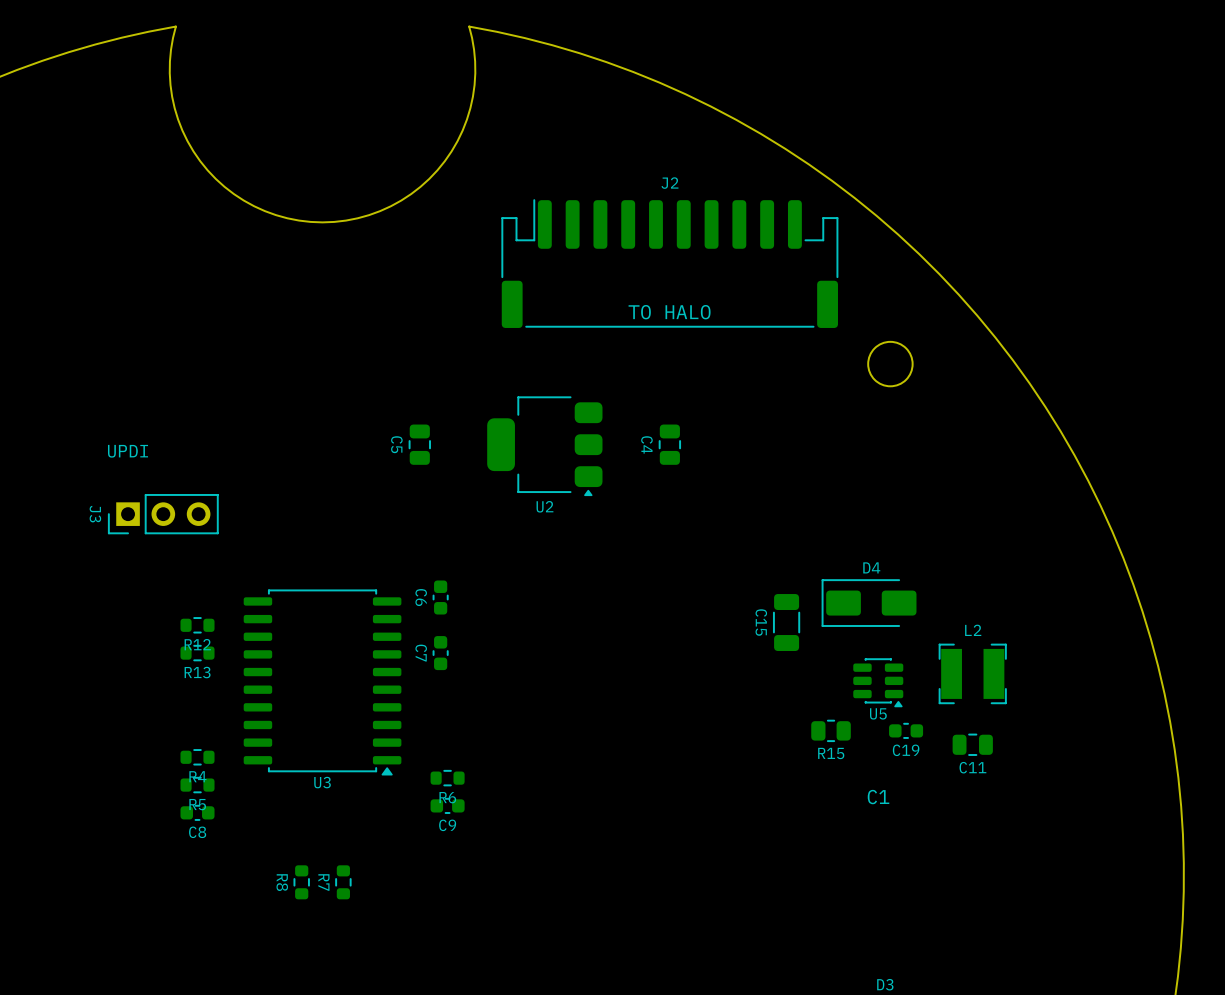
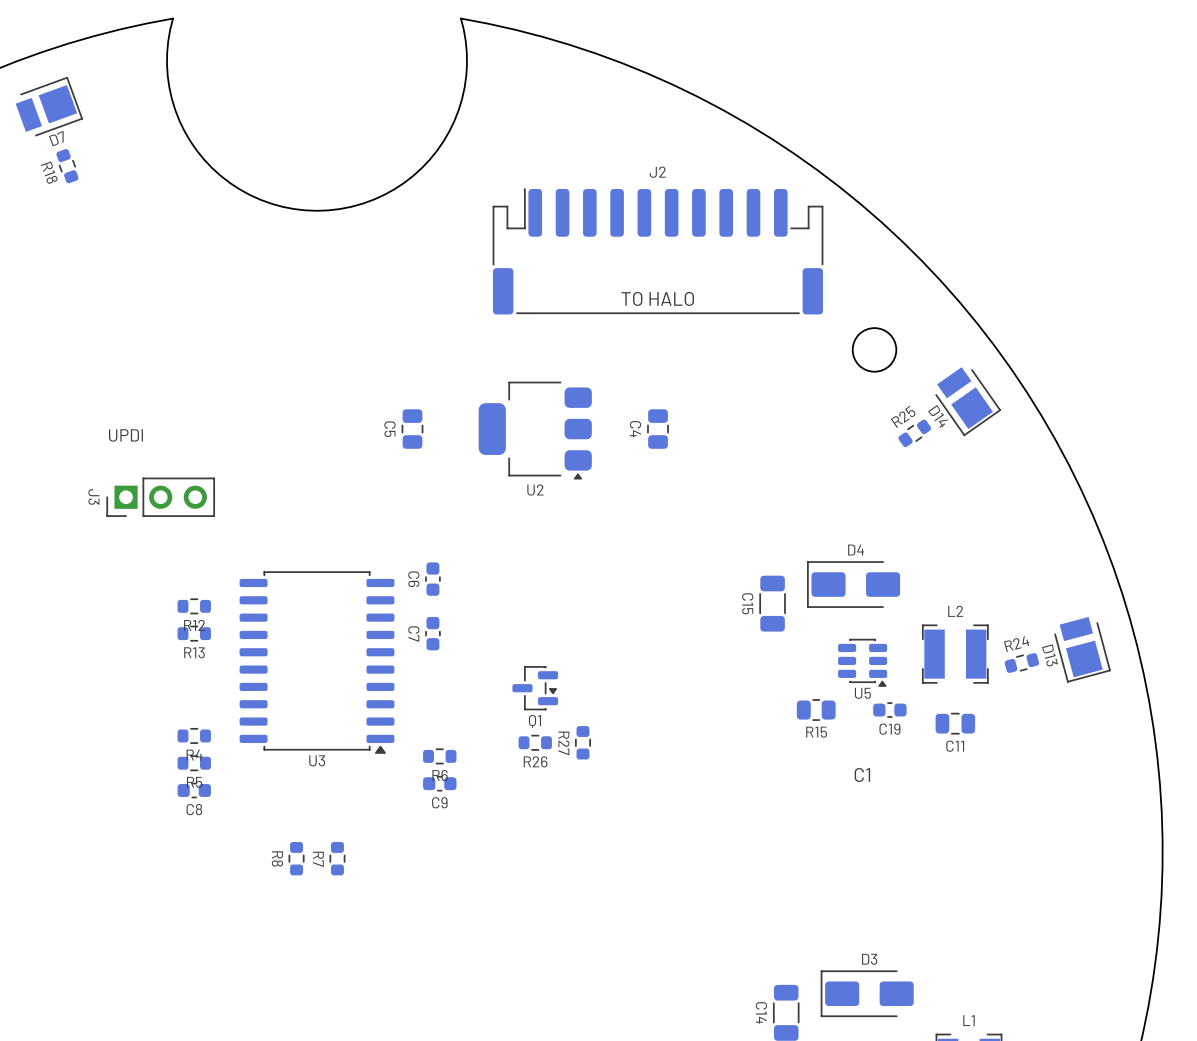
D7: none -> (49, 106)
R18: none -> (67, 166)
D14: none -> (968, 401)
R25: none -> (914, 433)
D13: none -> (1082, 649)
R24: none -> (1021, 663)
Q1: none -> (535, 688)
R26: none -> (535, 742)
R27: none -> (582, 742)

